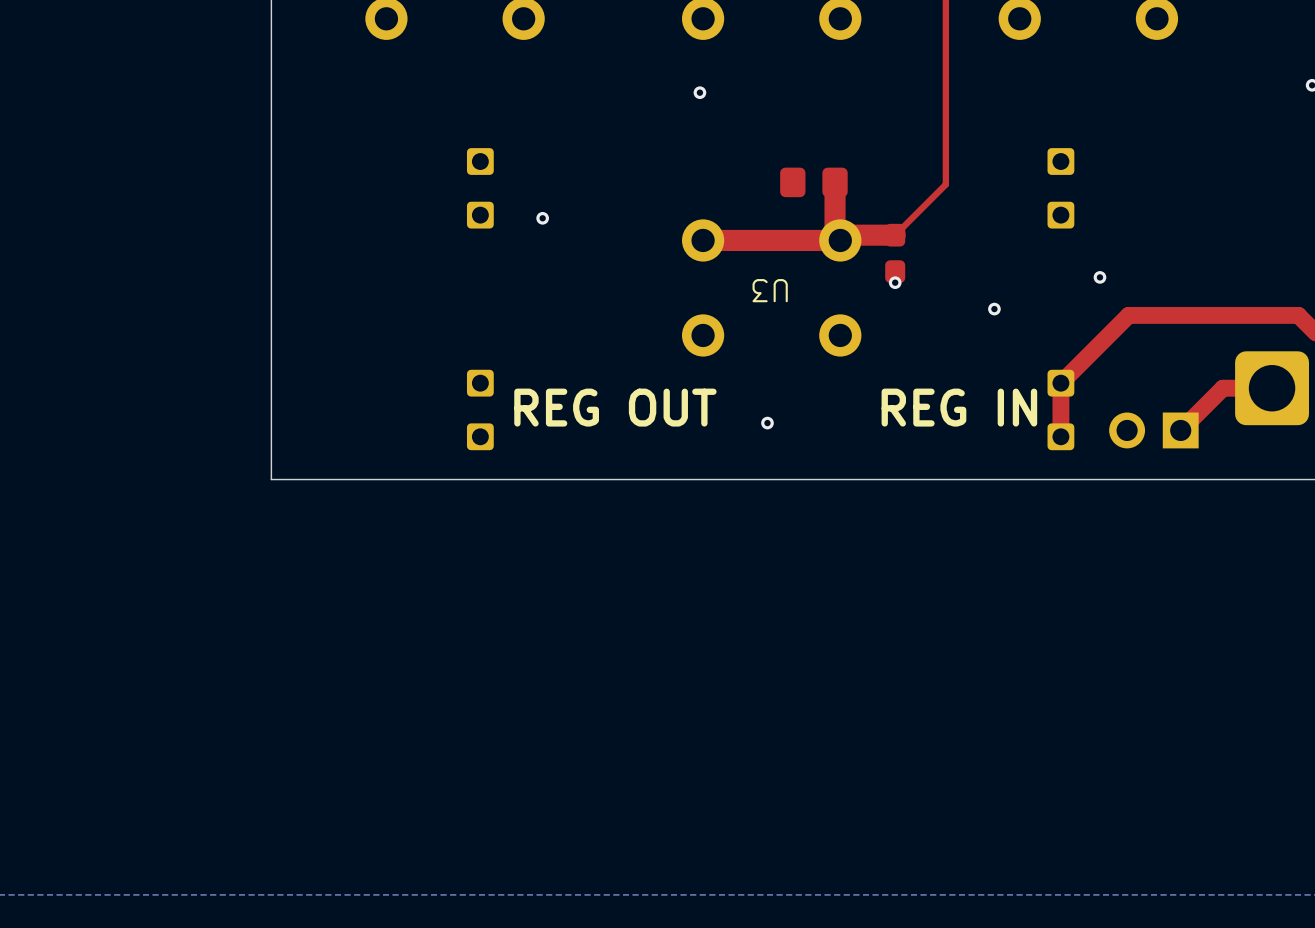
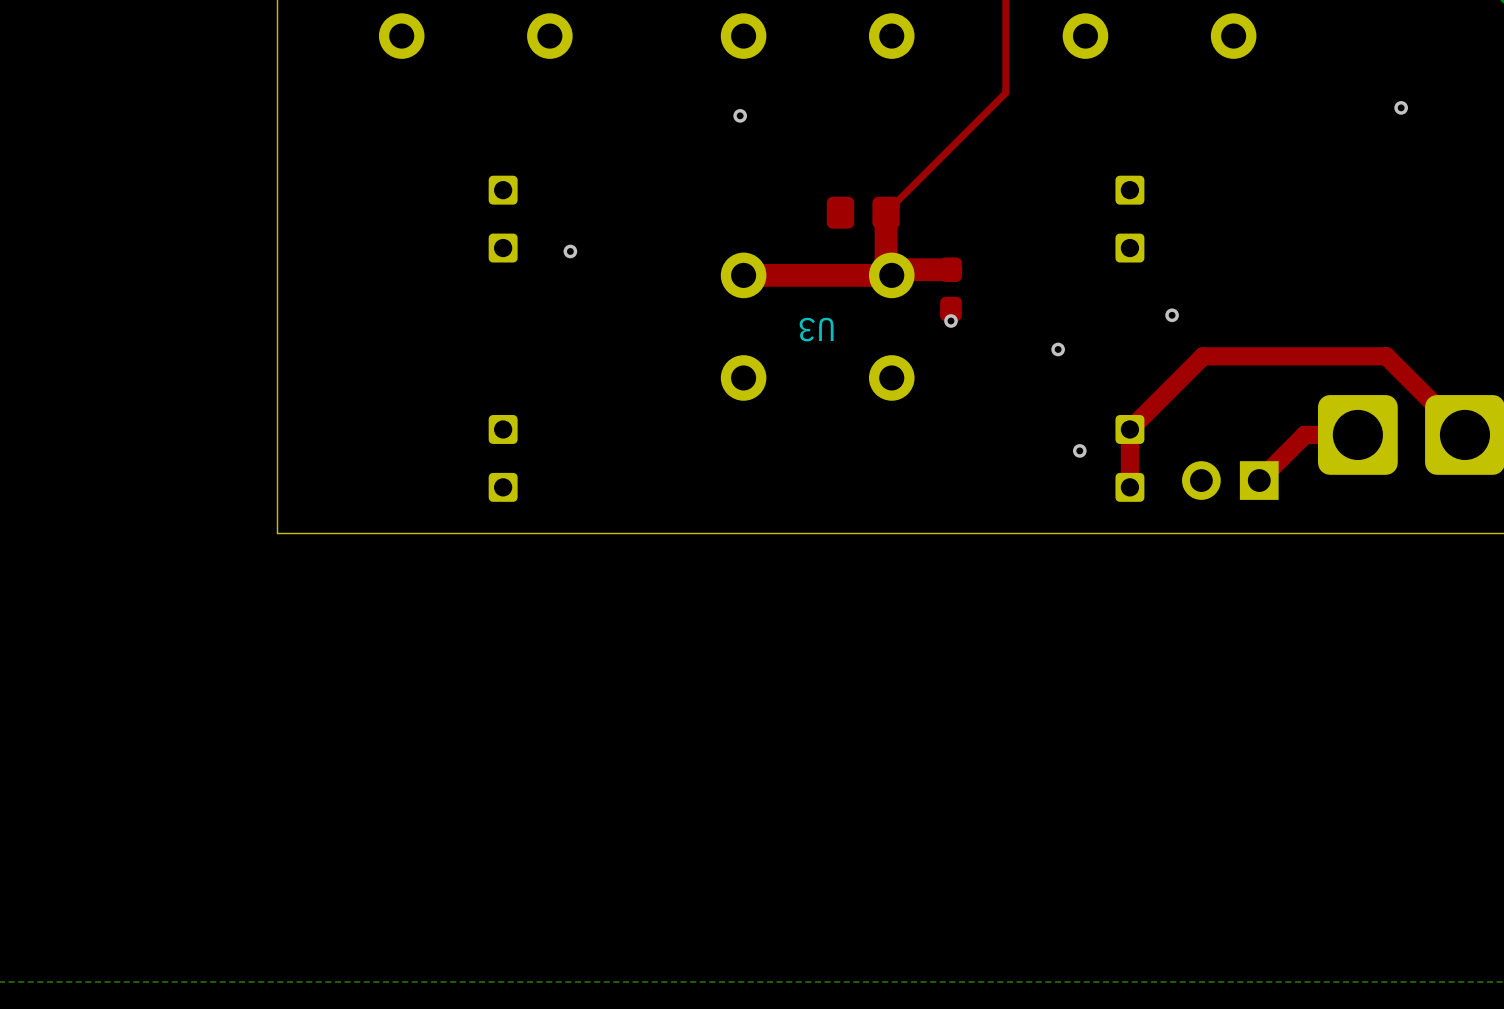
top track: (945, 71) (945, 184) (895, 235) -> (1005, 93) (886, 212)
via: none -> (1079, 450)
text: REG OUT (615, 407) -> none
text: REG IN (959, 407) -> none
via: (767, 423) -> none

